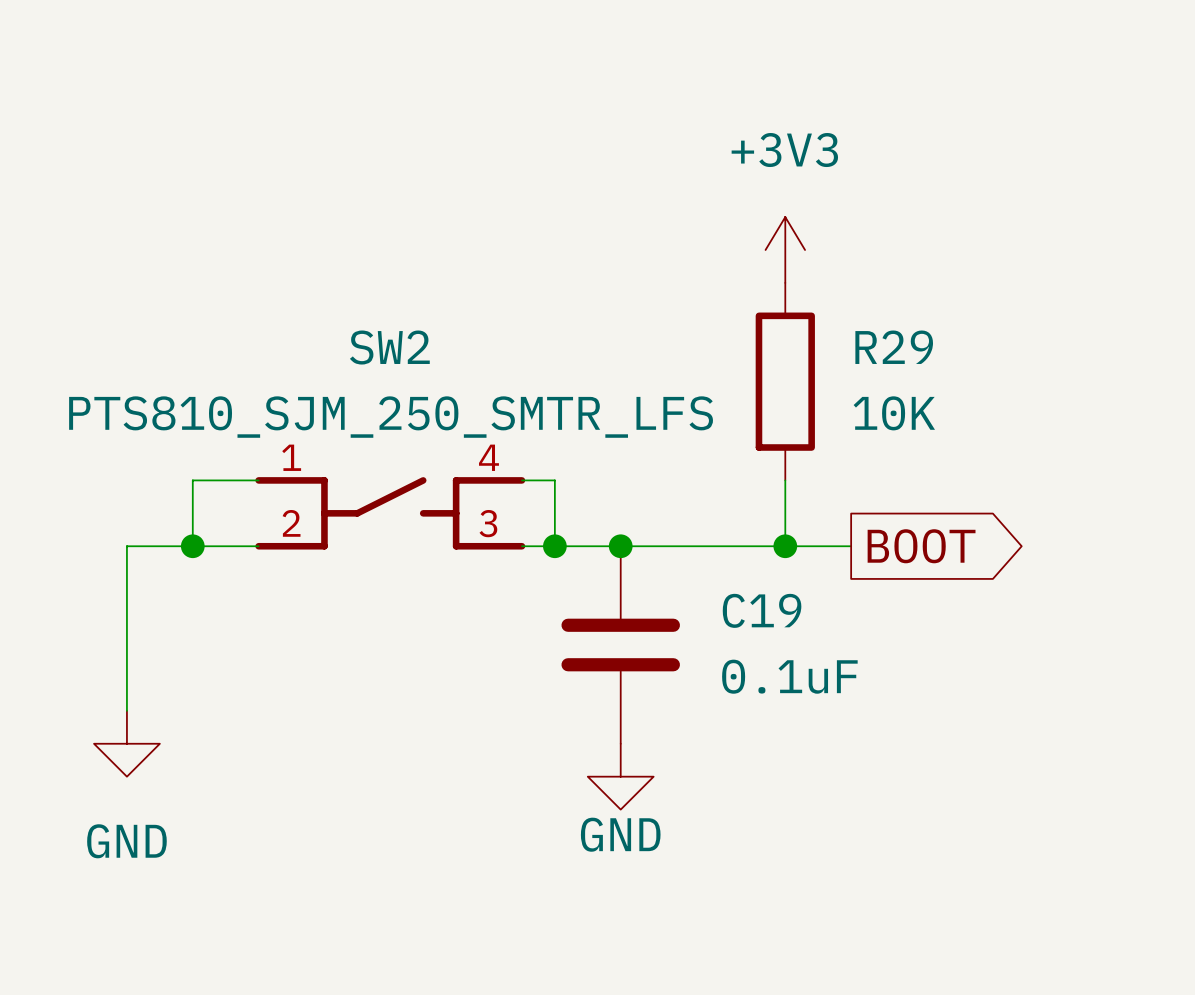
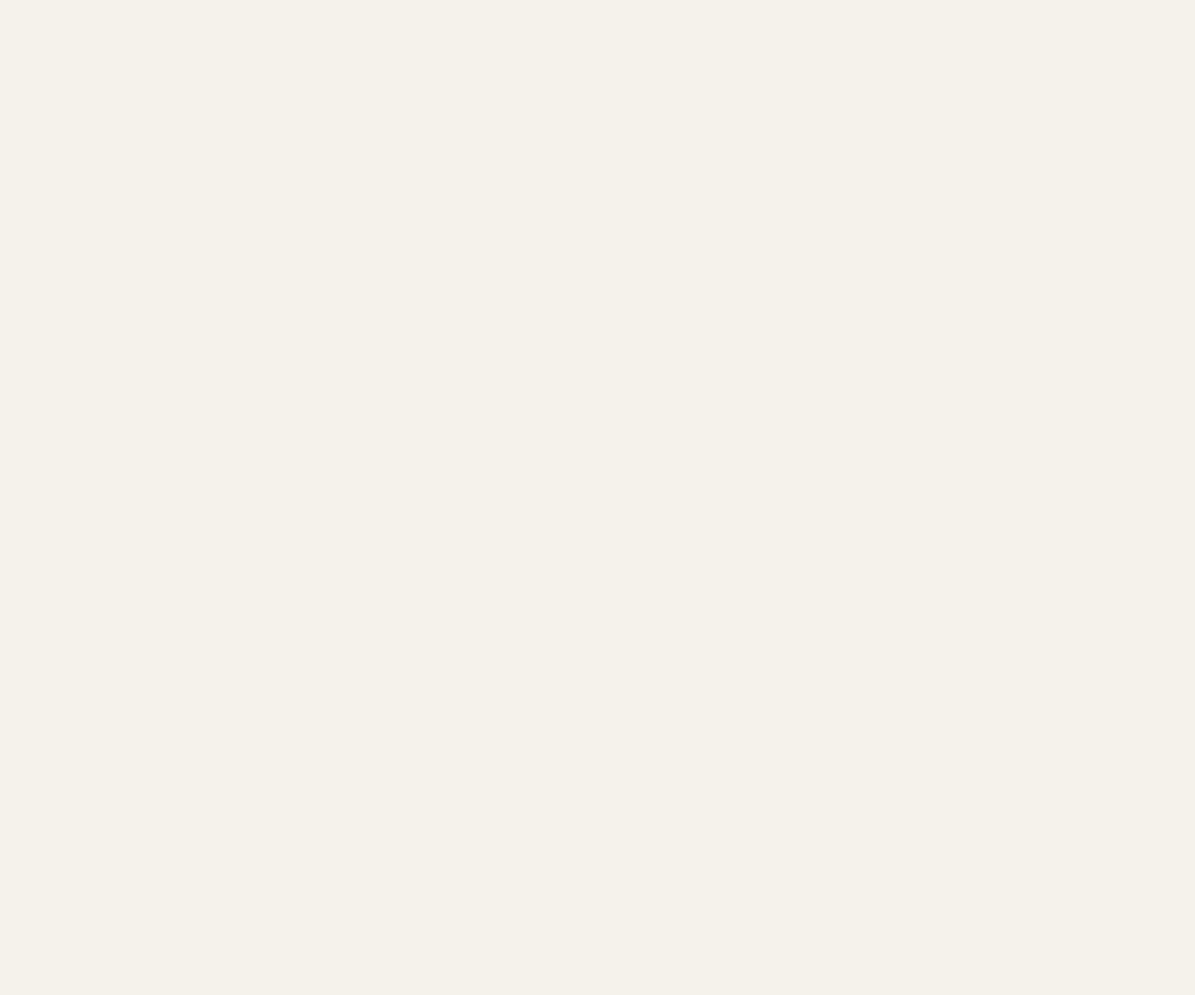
power symbol: +3V3 (785, 249) -> none
R29: 10K (785, 381) -> none
wire: (258, 480) (192, 480) (192, 546) -> none
wire: (521, 480) (554, 480) (554, 546) -> none
wire: (785, 480) (785, 546) -> none
SW2: PTS810_SJM_250_SMTR_LFS (390, 513) -> none
junction: (192, 546) -> none
wire: (258, 546) (126, 546) (126, 710) -> none
wire: (521, 546) (851, 546) -> none
junction: (554, 546) -> none
junction: (620, 546) -> none
junction: (785, 546) -> none
global label: BOOT (921, 546) -> none
C19: 0.1uF (620, 645) -> none
power symbol: GND (126, 743) -> none
power symbol: GND (620, 776) -> none

